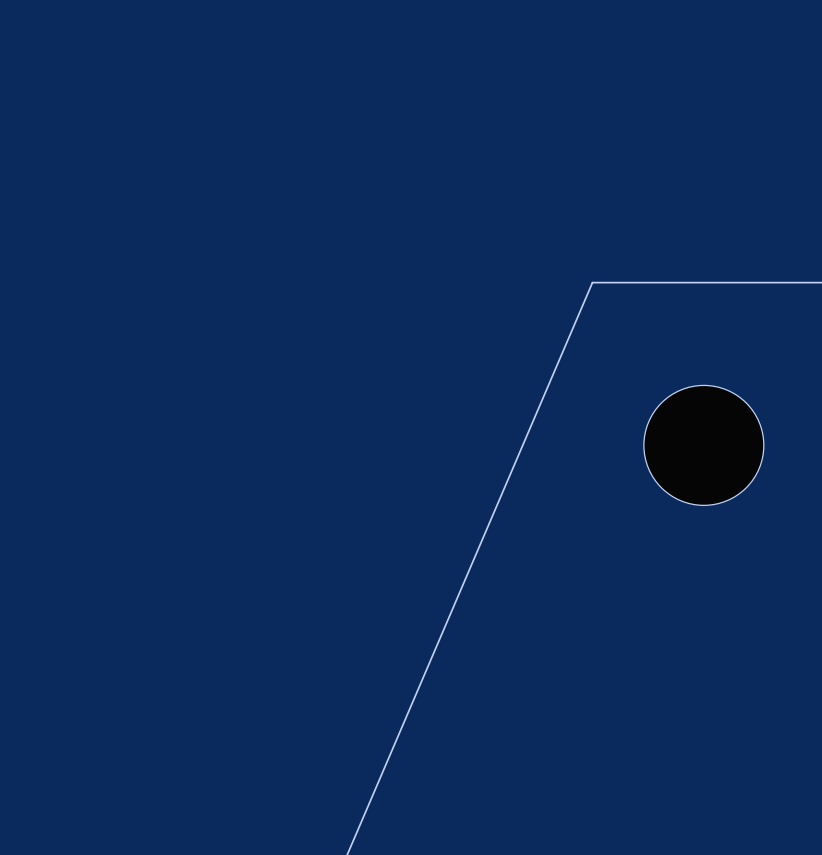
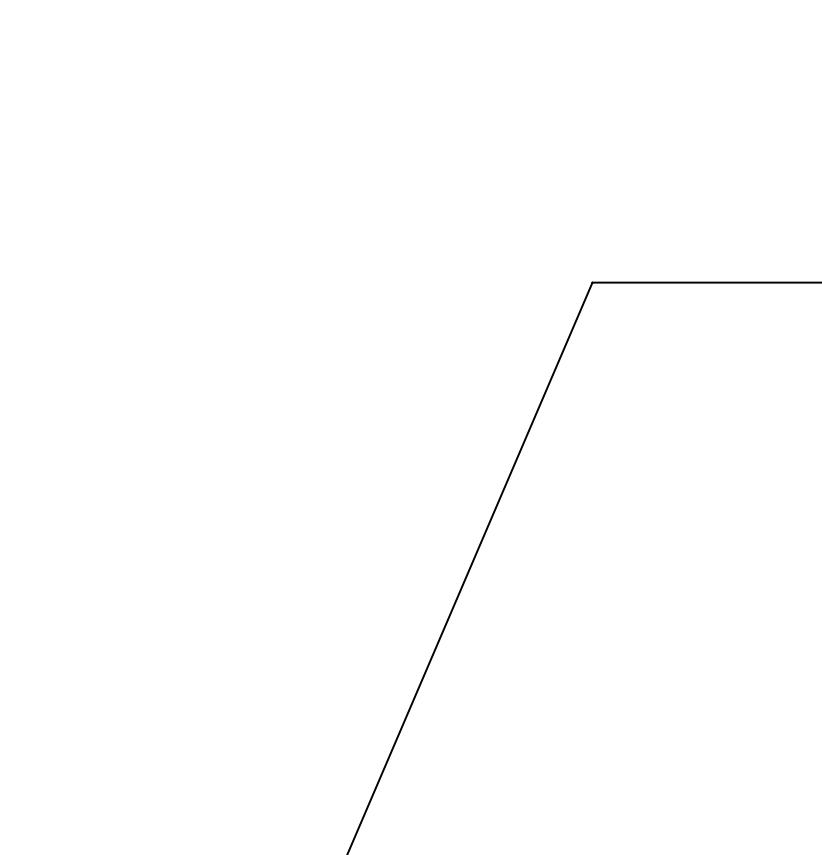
hole: (703, 445) -> none

